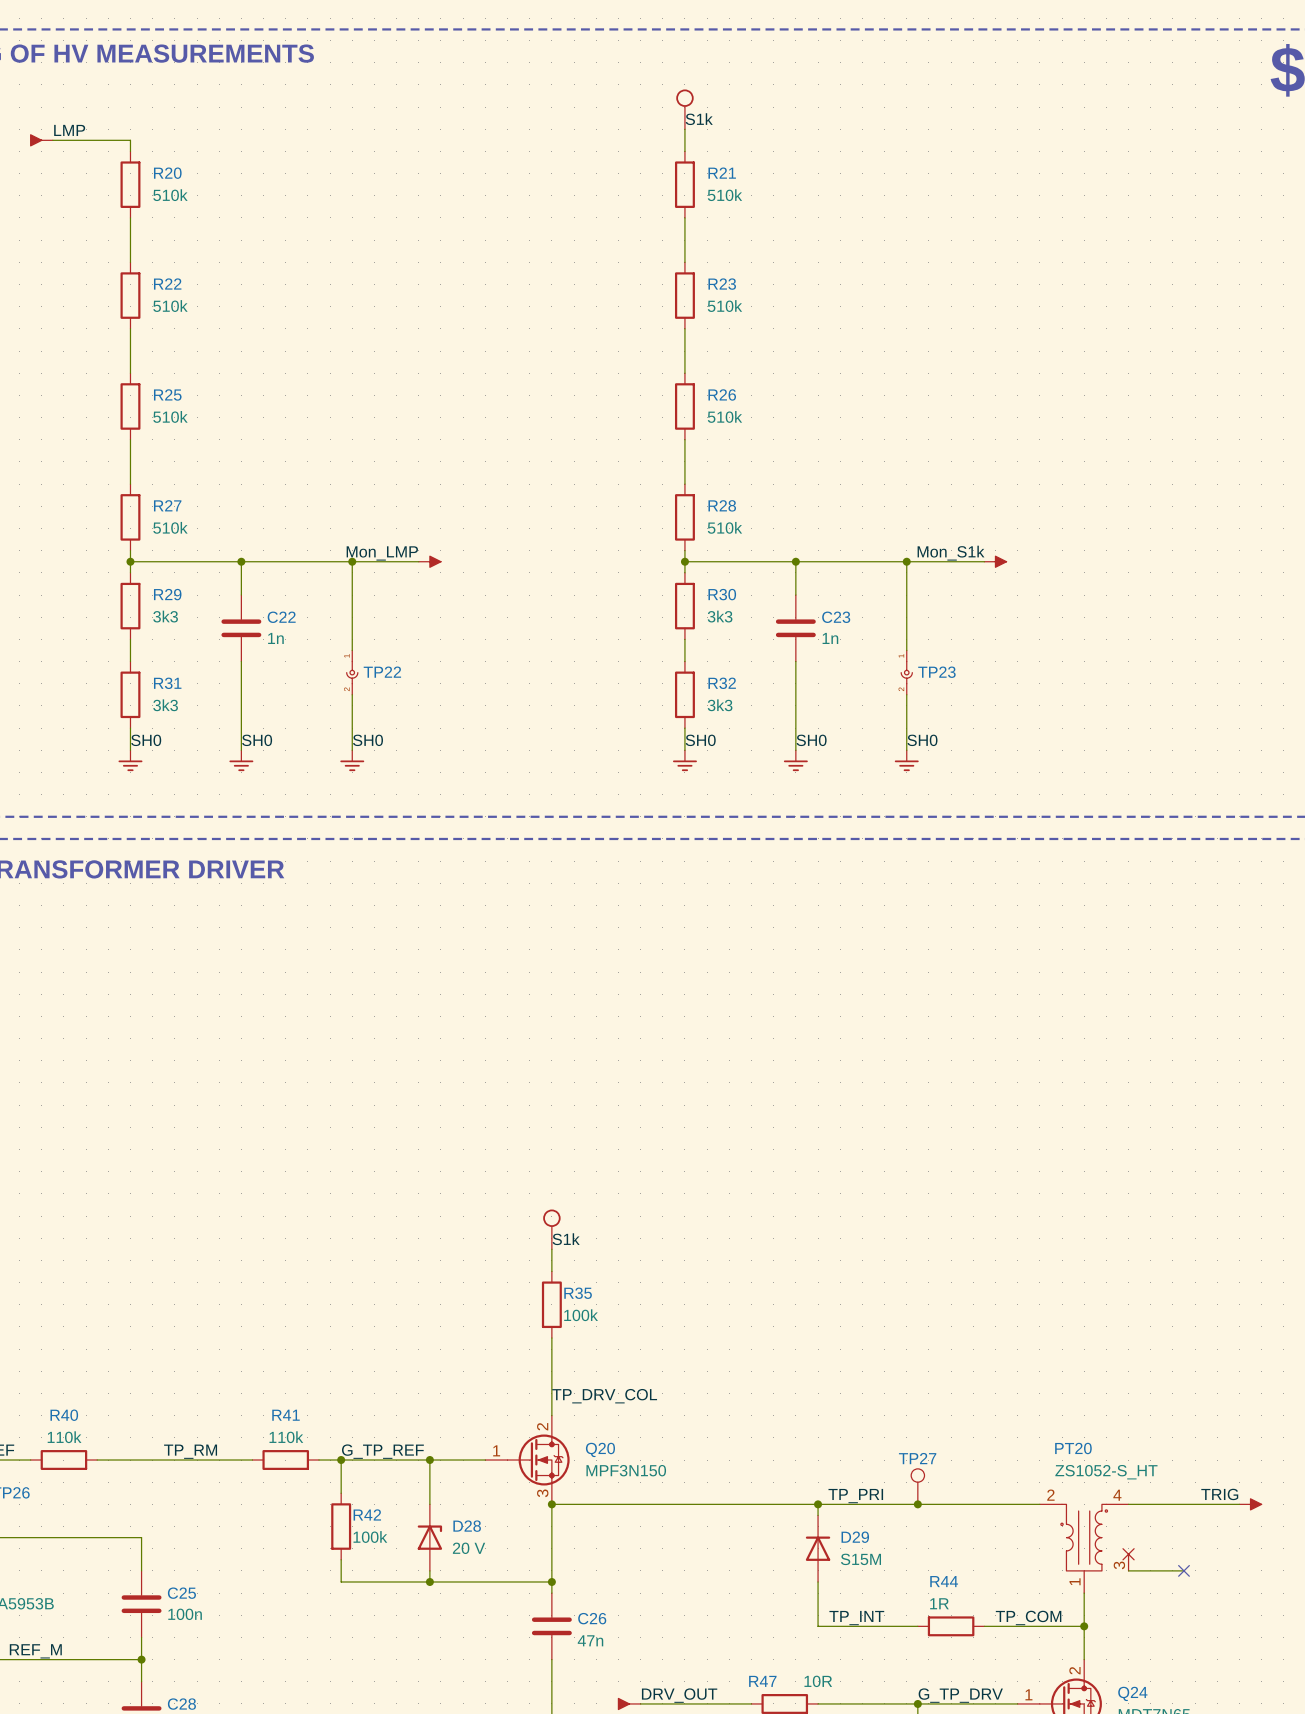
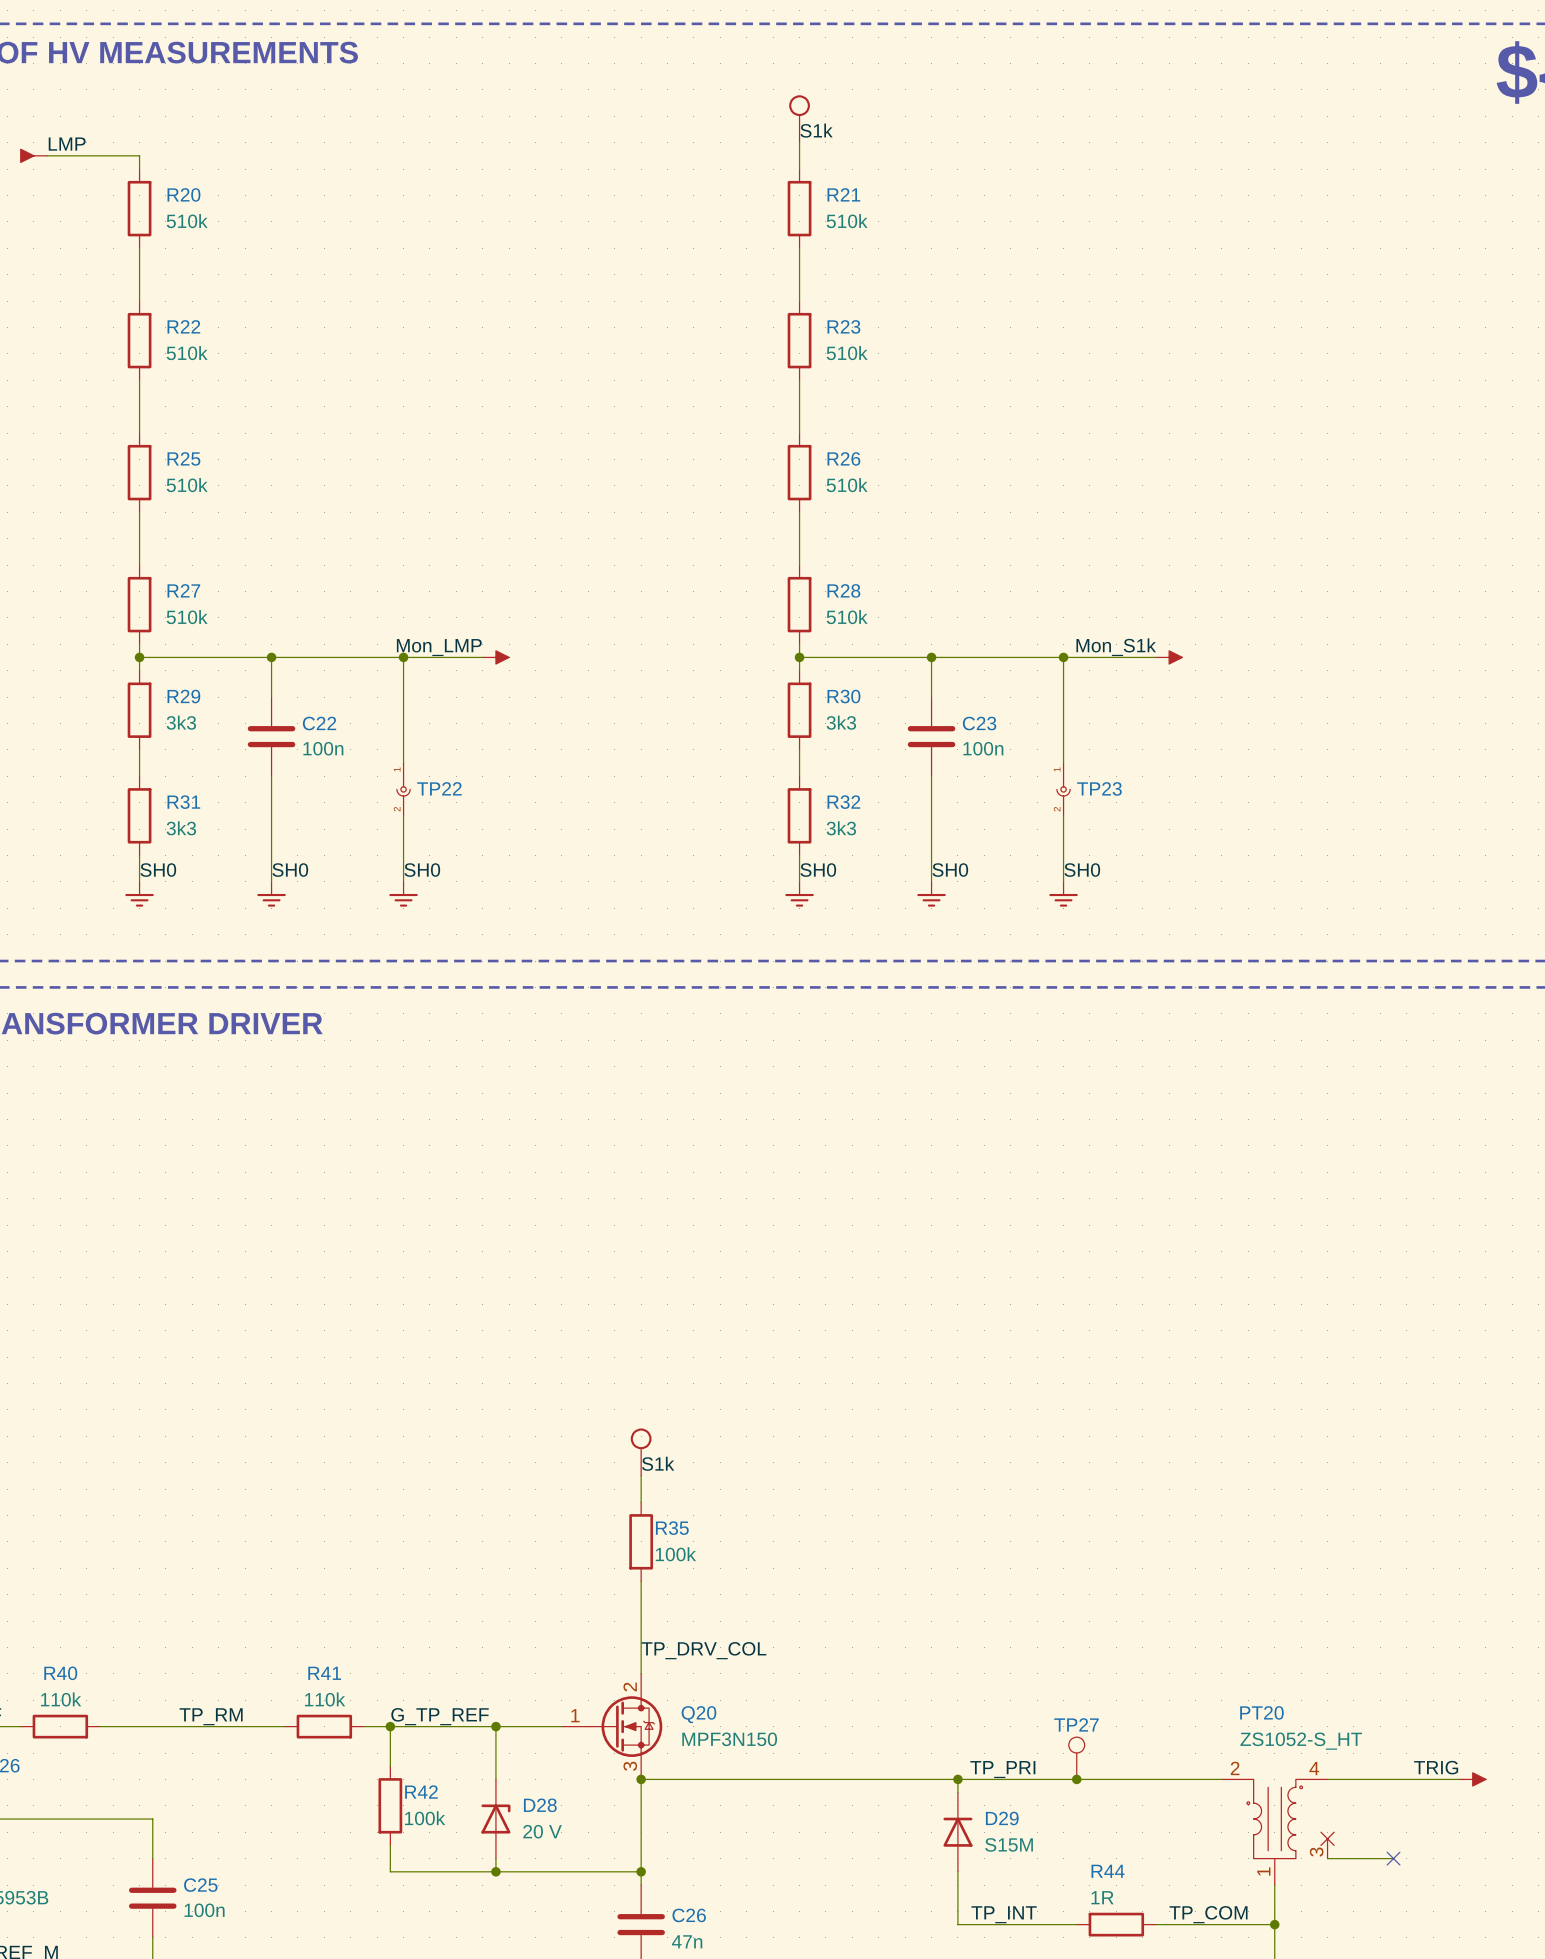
C22 value: 1n (275, 638) -> 100n (323, 748)
C23 value: 1n (830, 638) -> 100n (983, 748)

